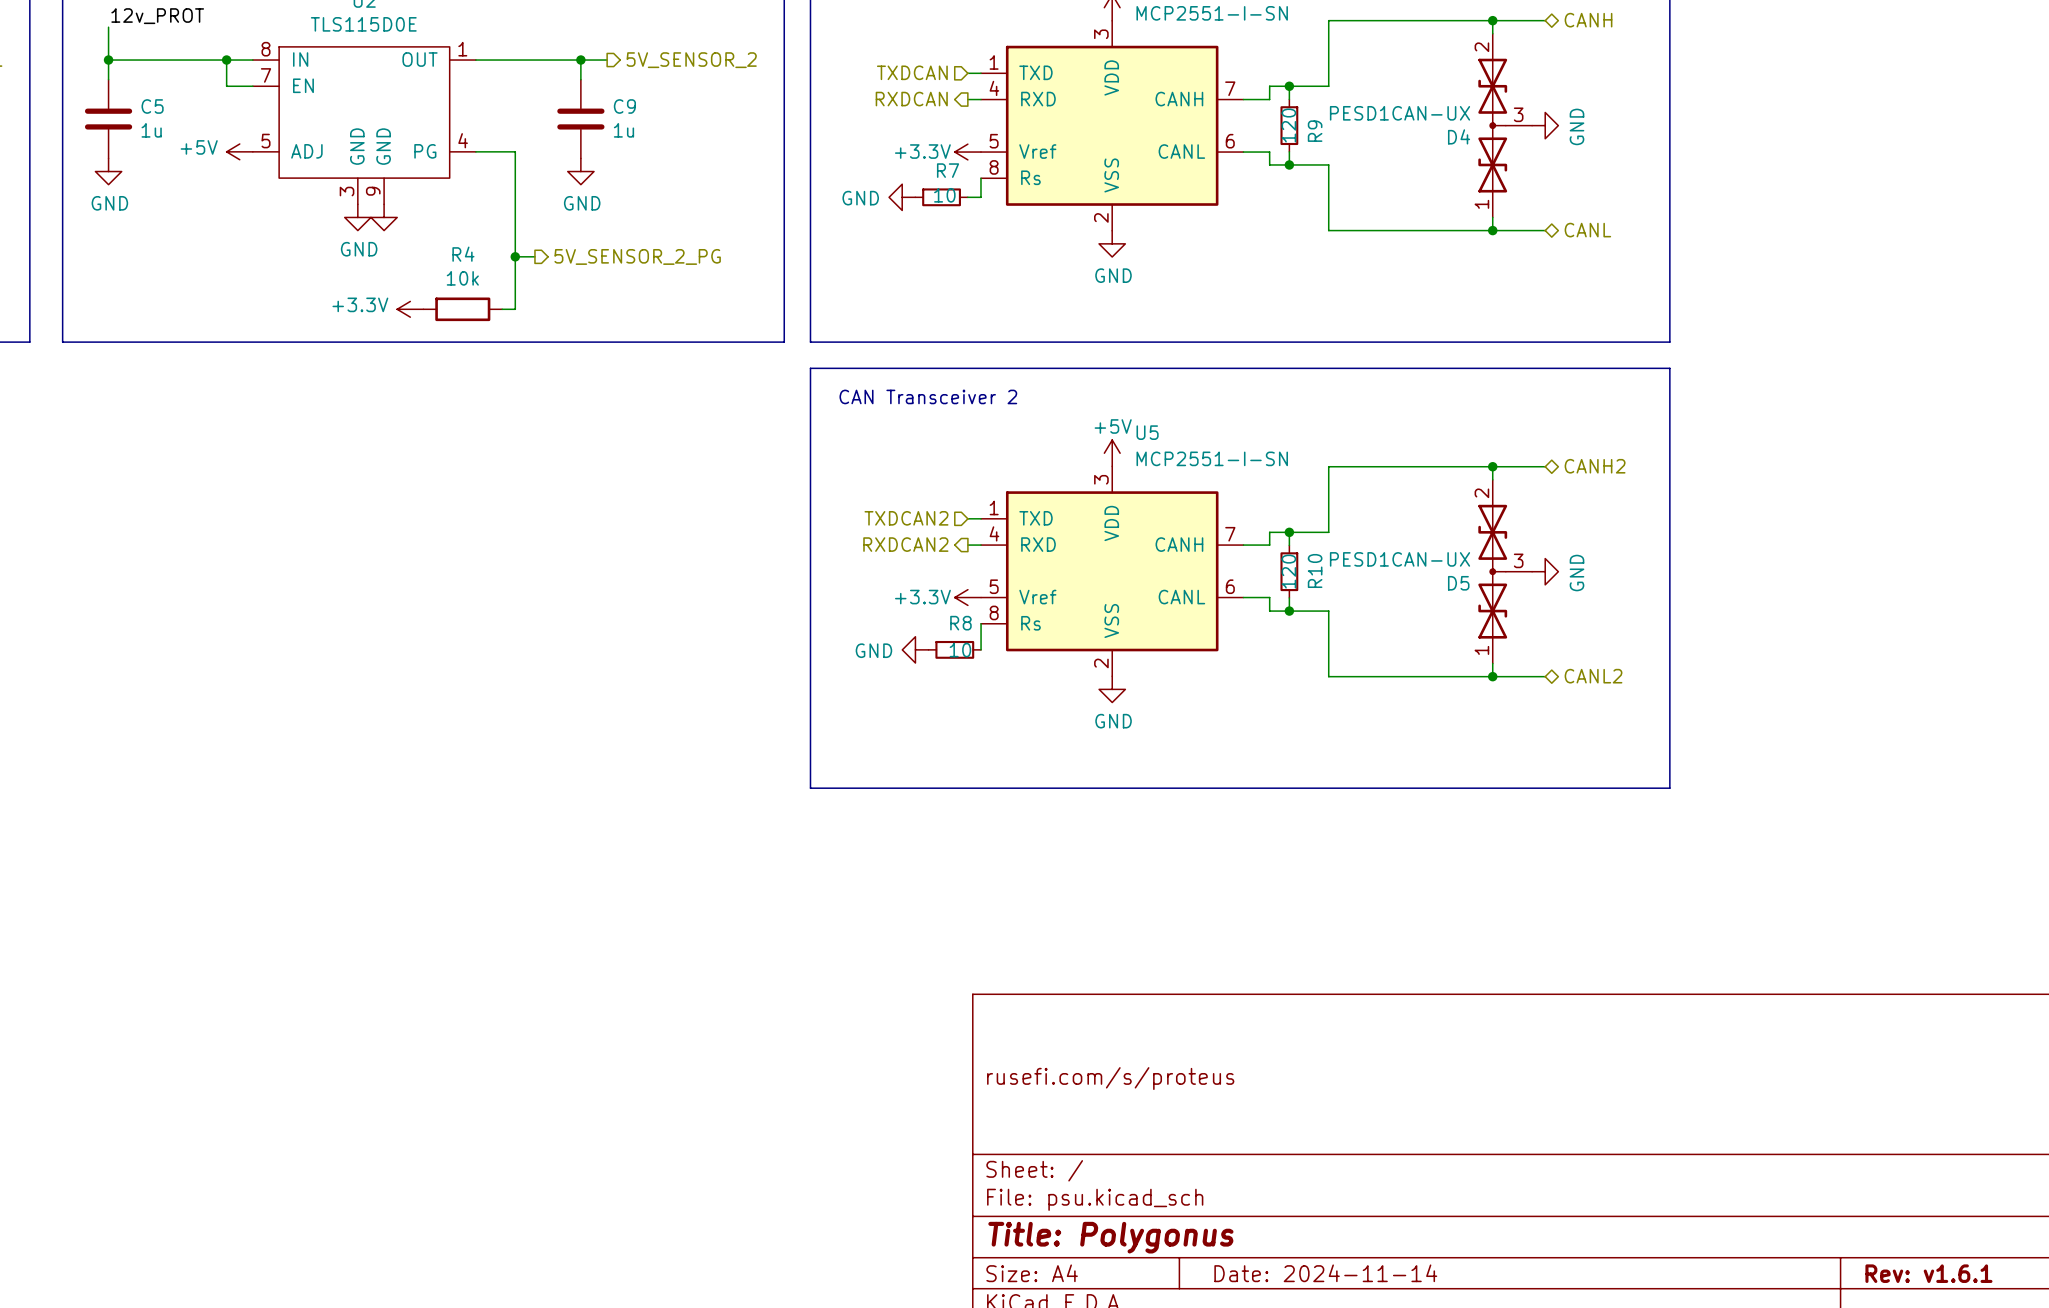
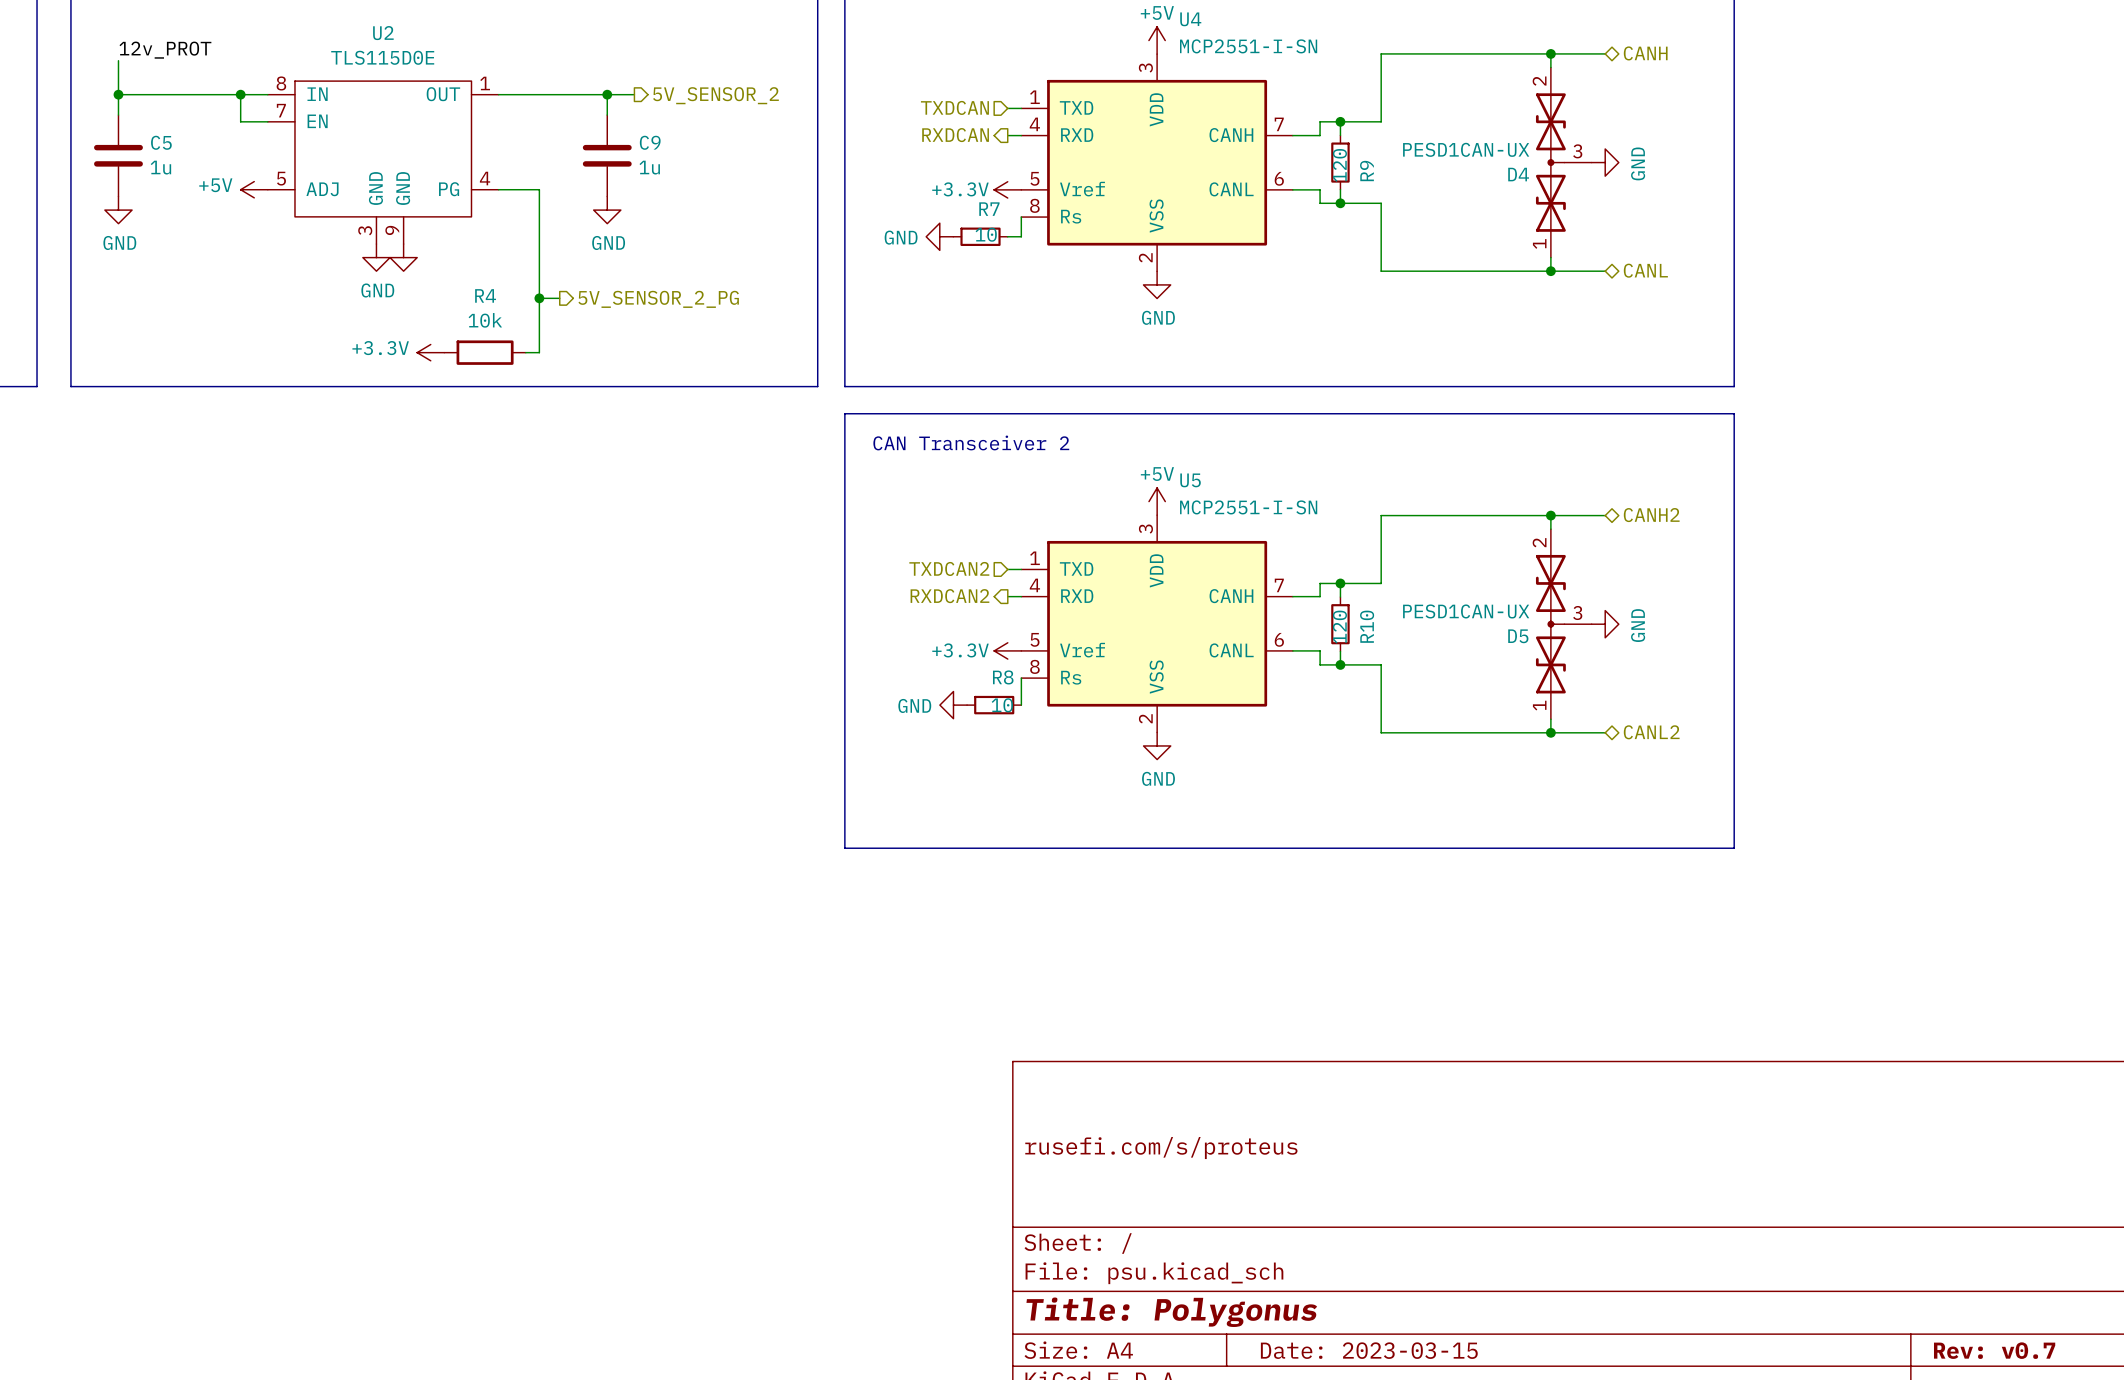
title block: Date: 2024-11-14 (1325, 1273) -> Date: 2023-03-15 (1369, 1350)
title block: Rev: v1.6.1 (1928, 1273) -> Rev: v0.7 (1994, 1350)

